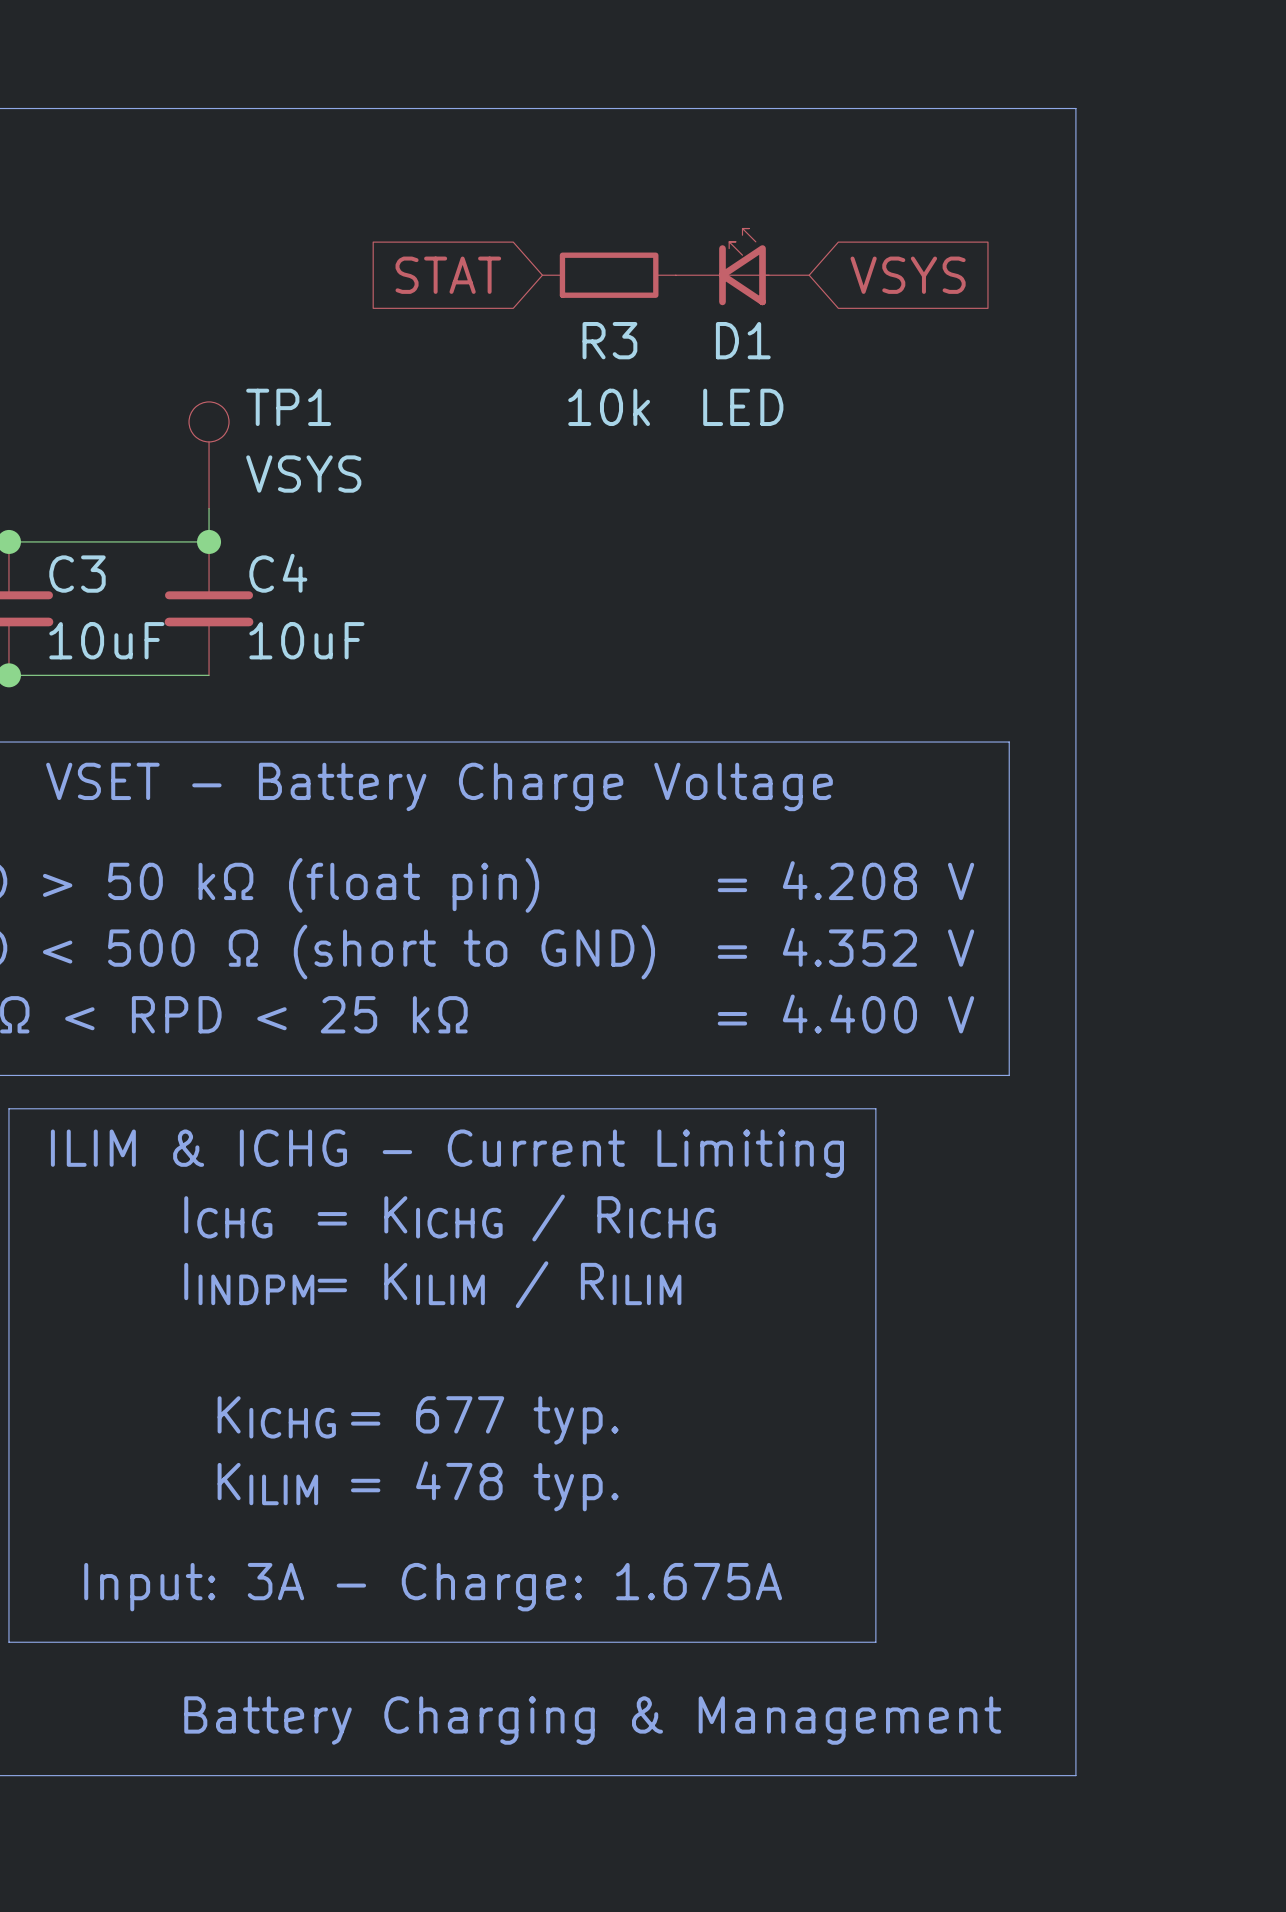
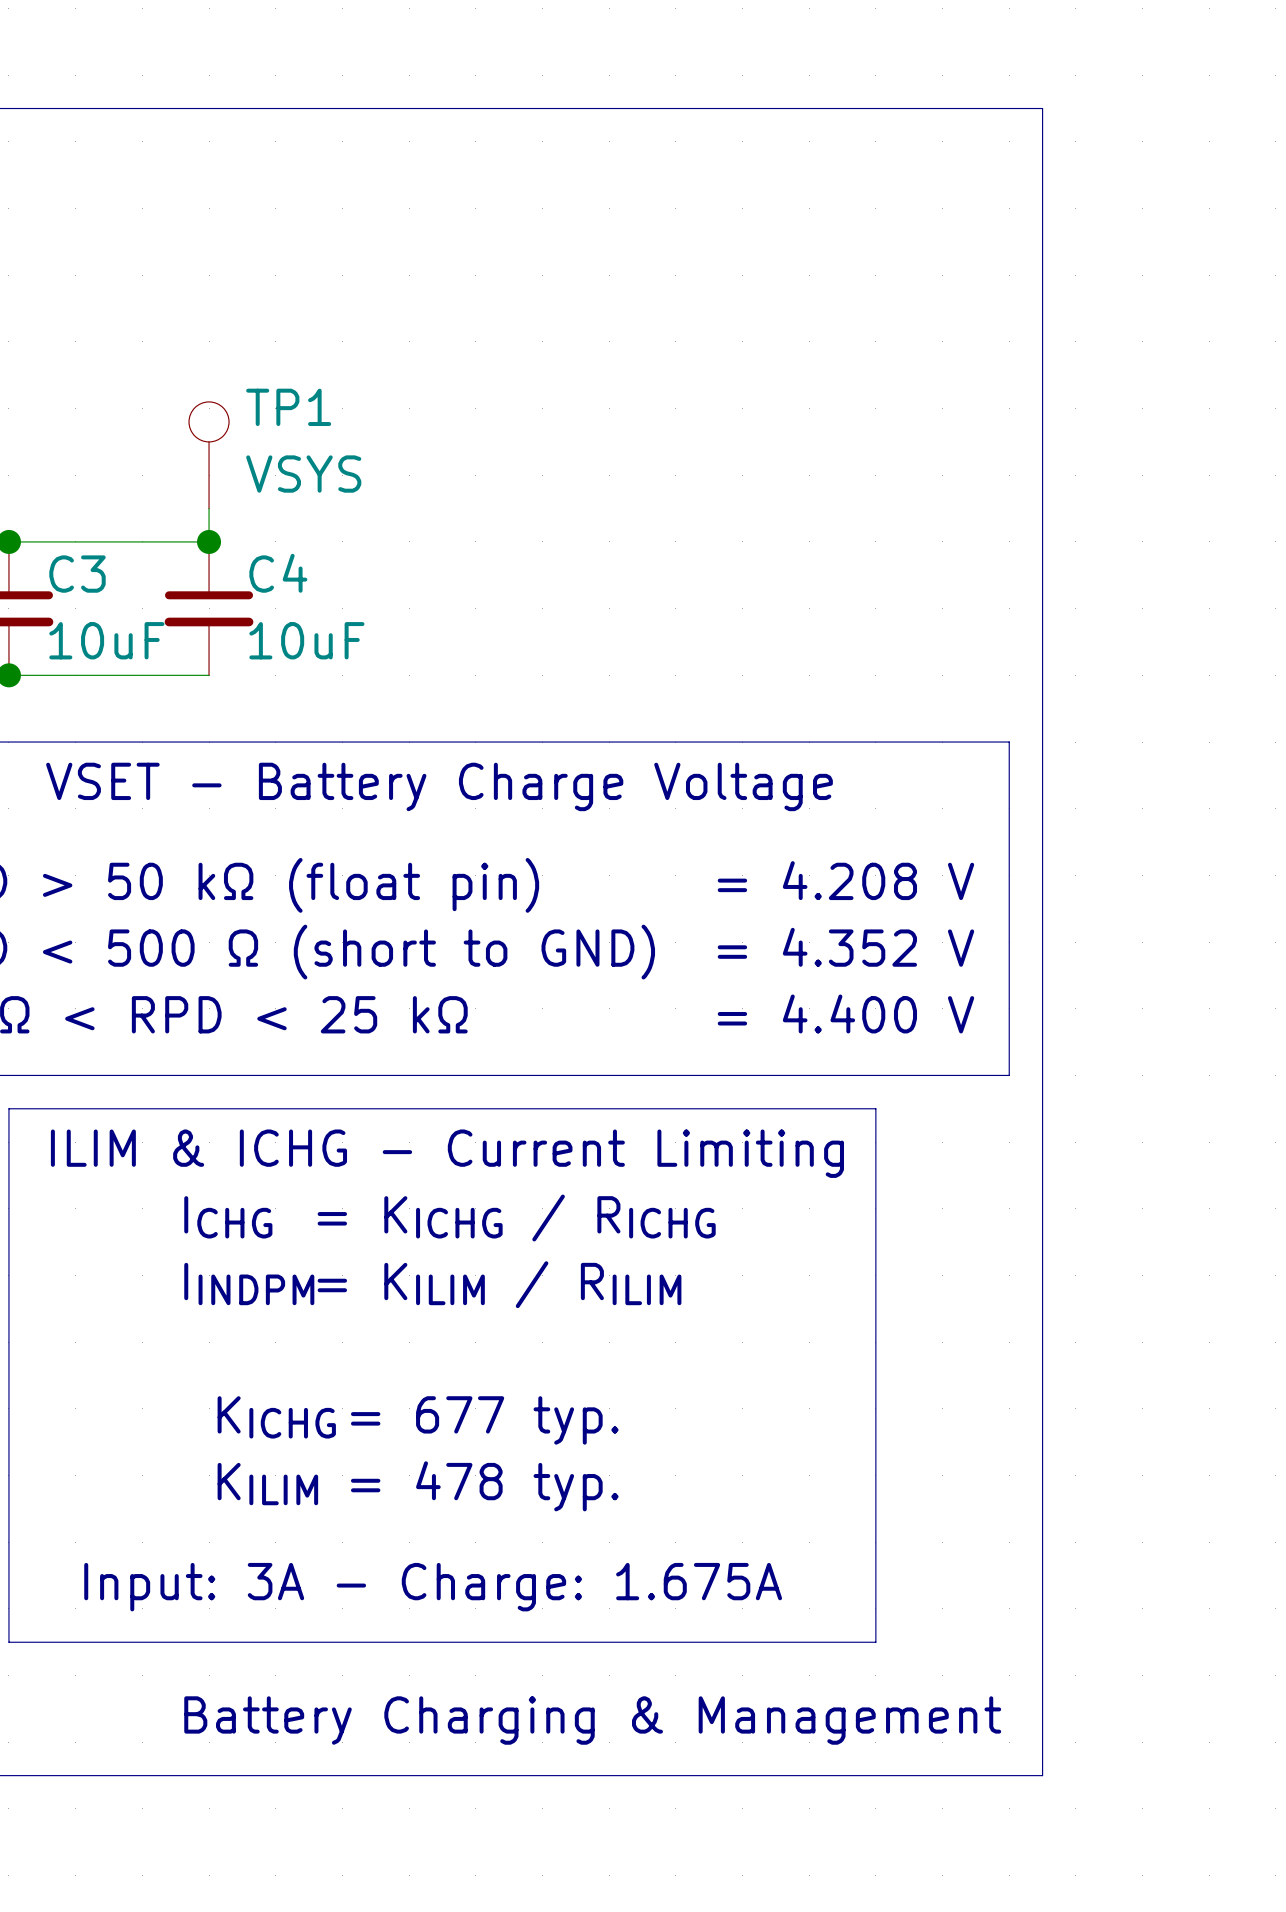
line: (1042, 108) (1075, 108) (1075, 1775) (1042, 1775) -> (1042, 108) (1042, 1775)
D1: LED (742, 266) -> none
global label: STAT (448, 275) -> none
R3: 10k (609, 275) -> none
global label: VSYS (908, 275) -> none

